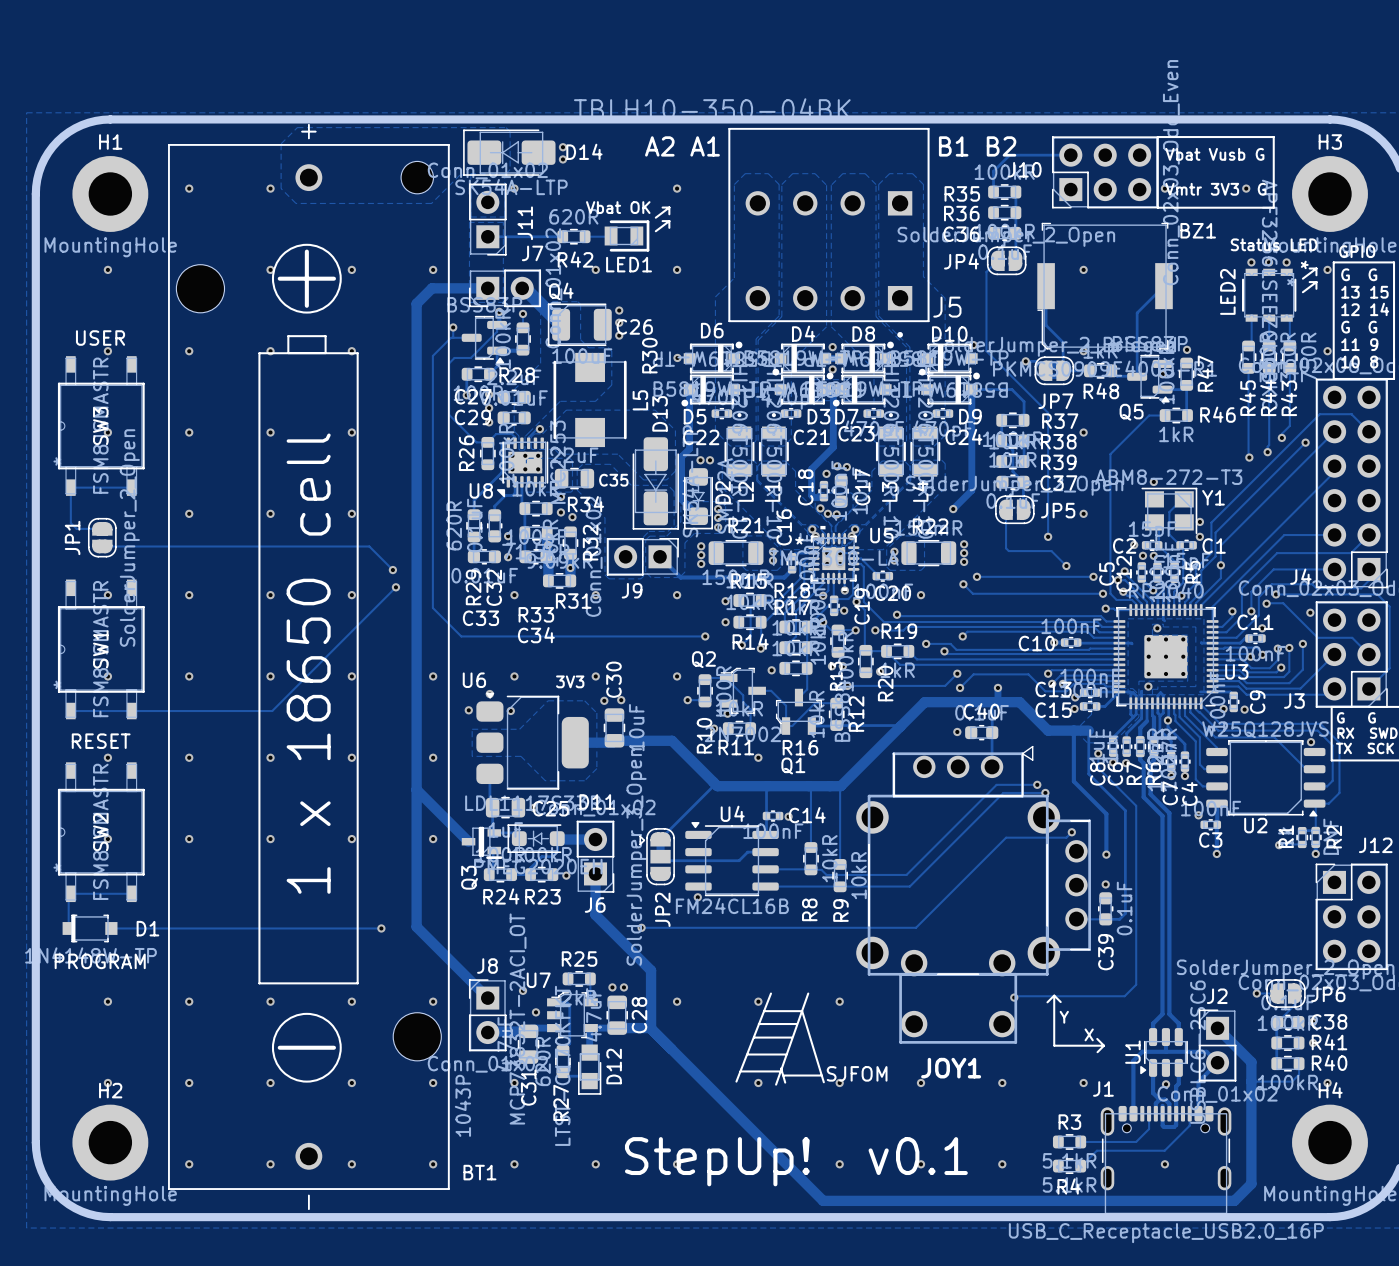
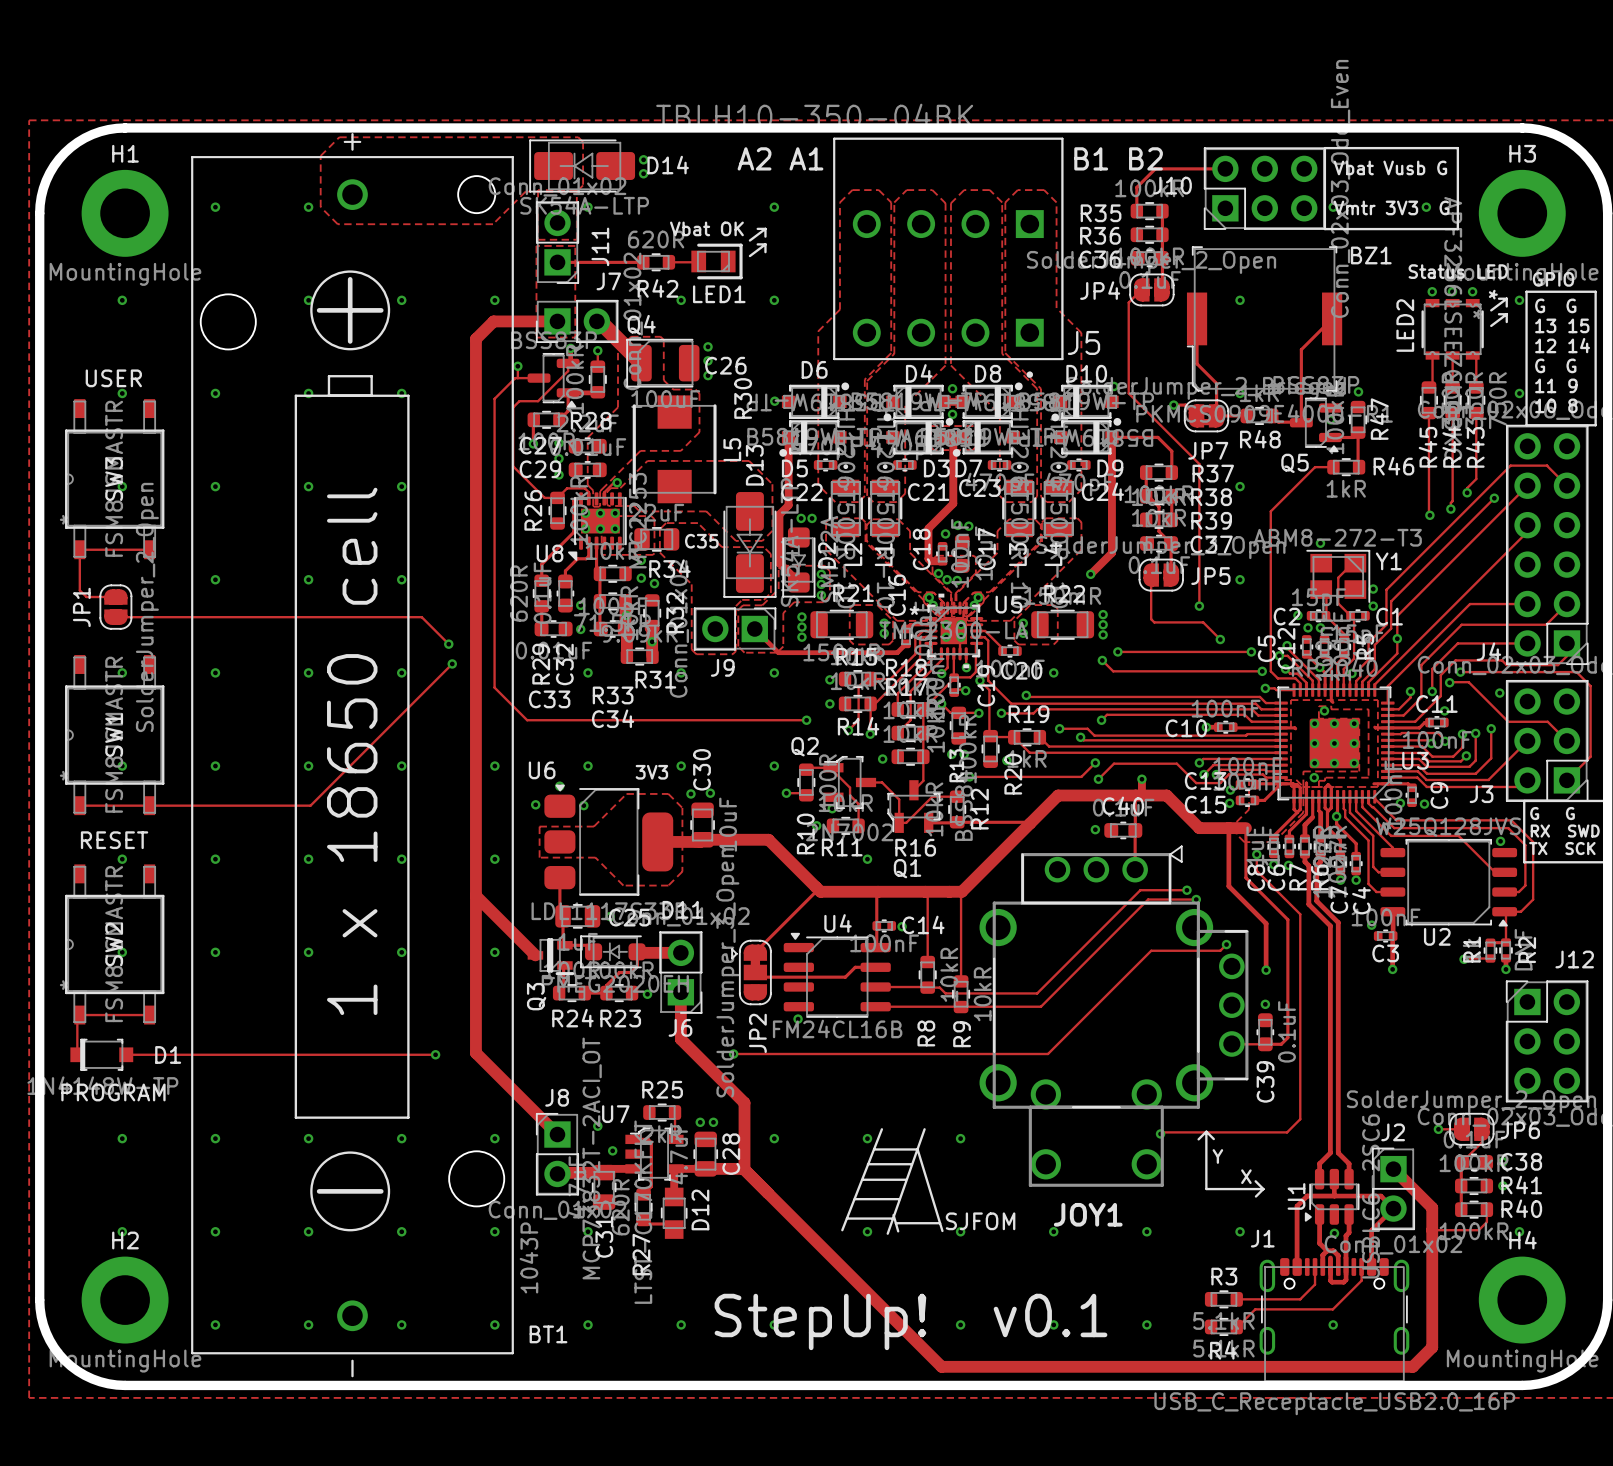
D12 footprint: [578, 1044, 602, 1095] -> [660, 1187, 688, 1239]

